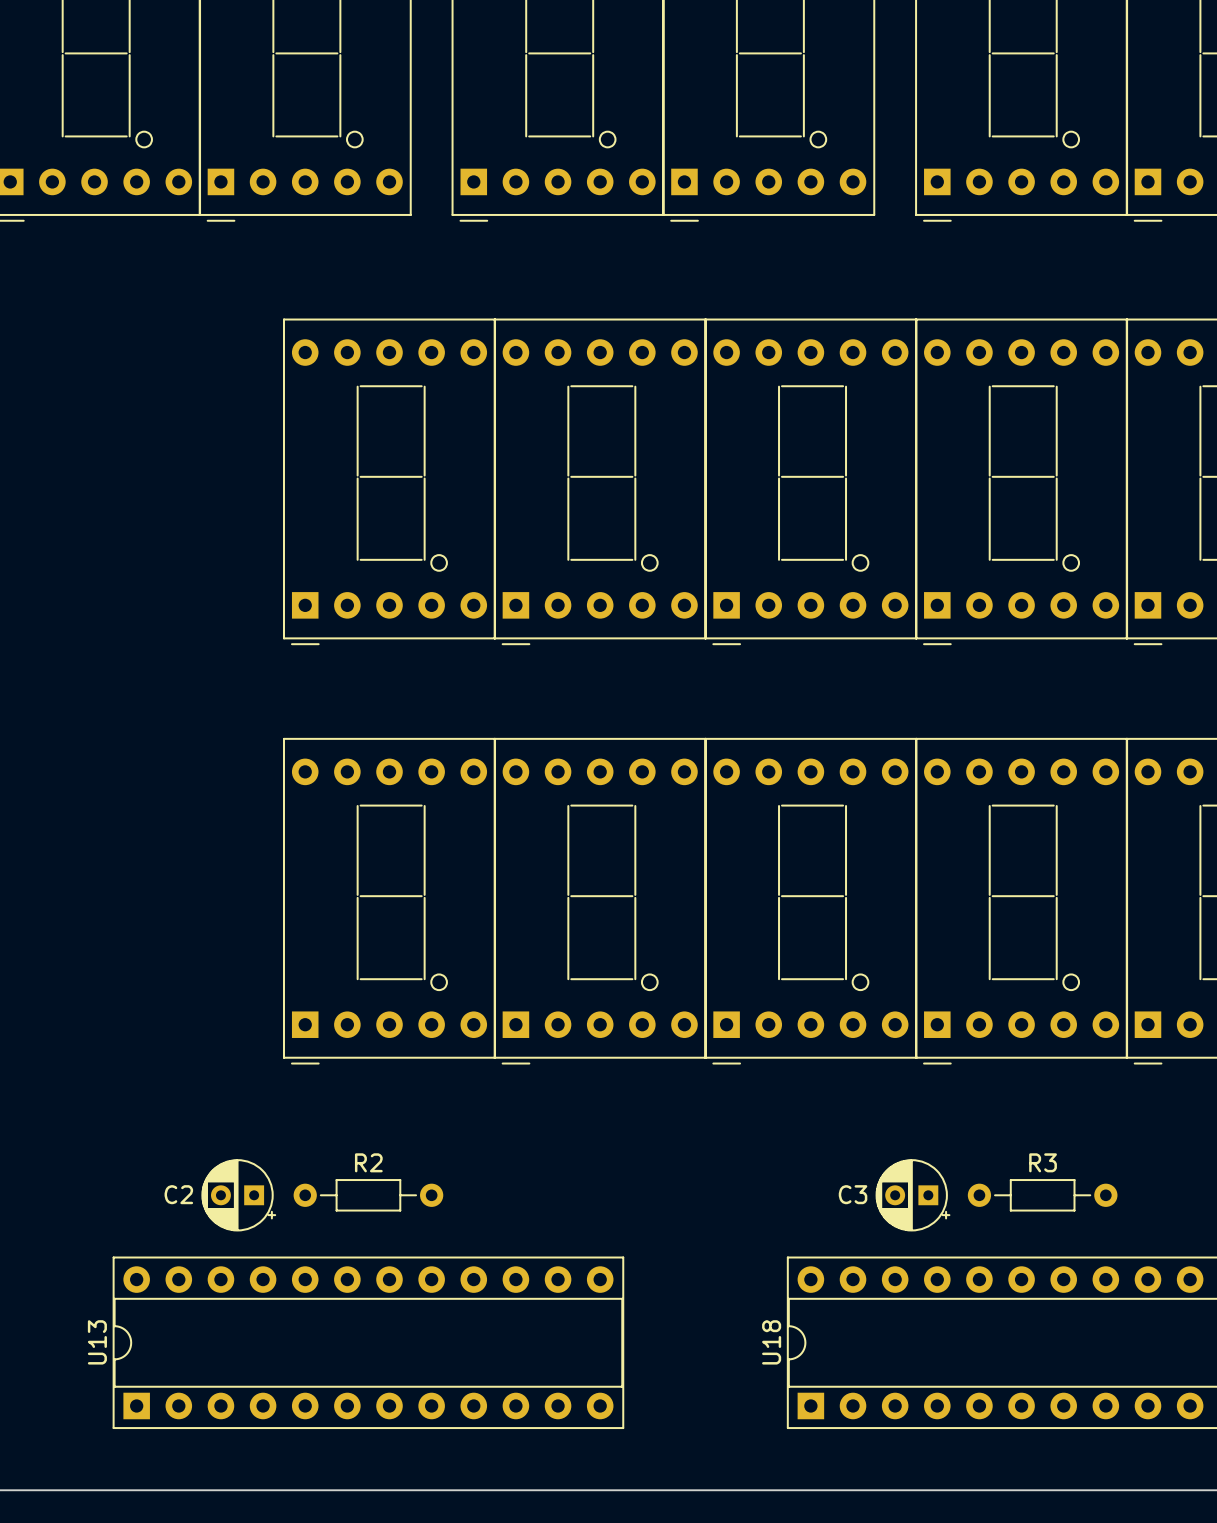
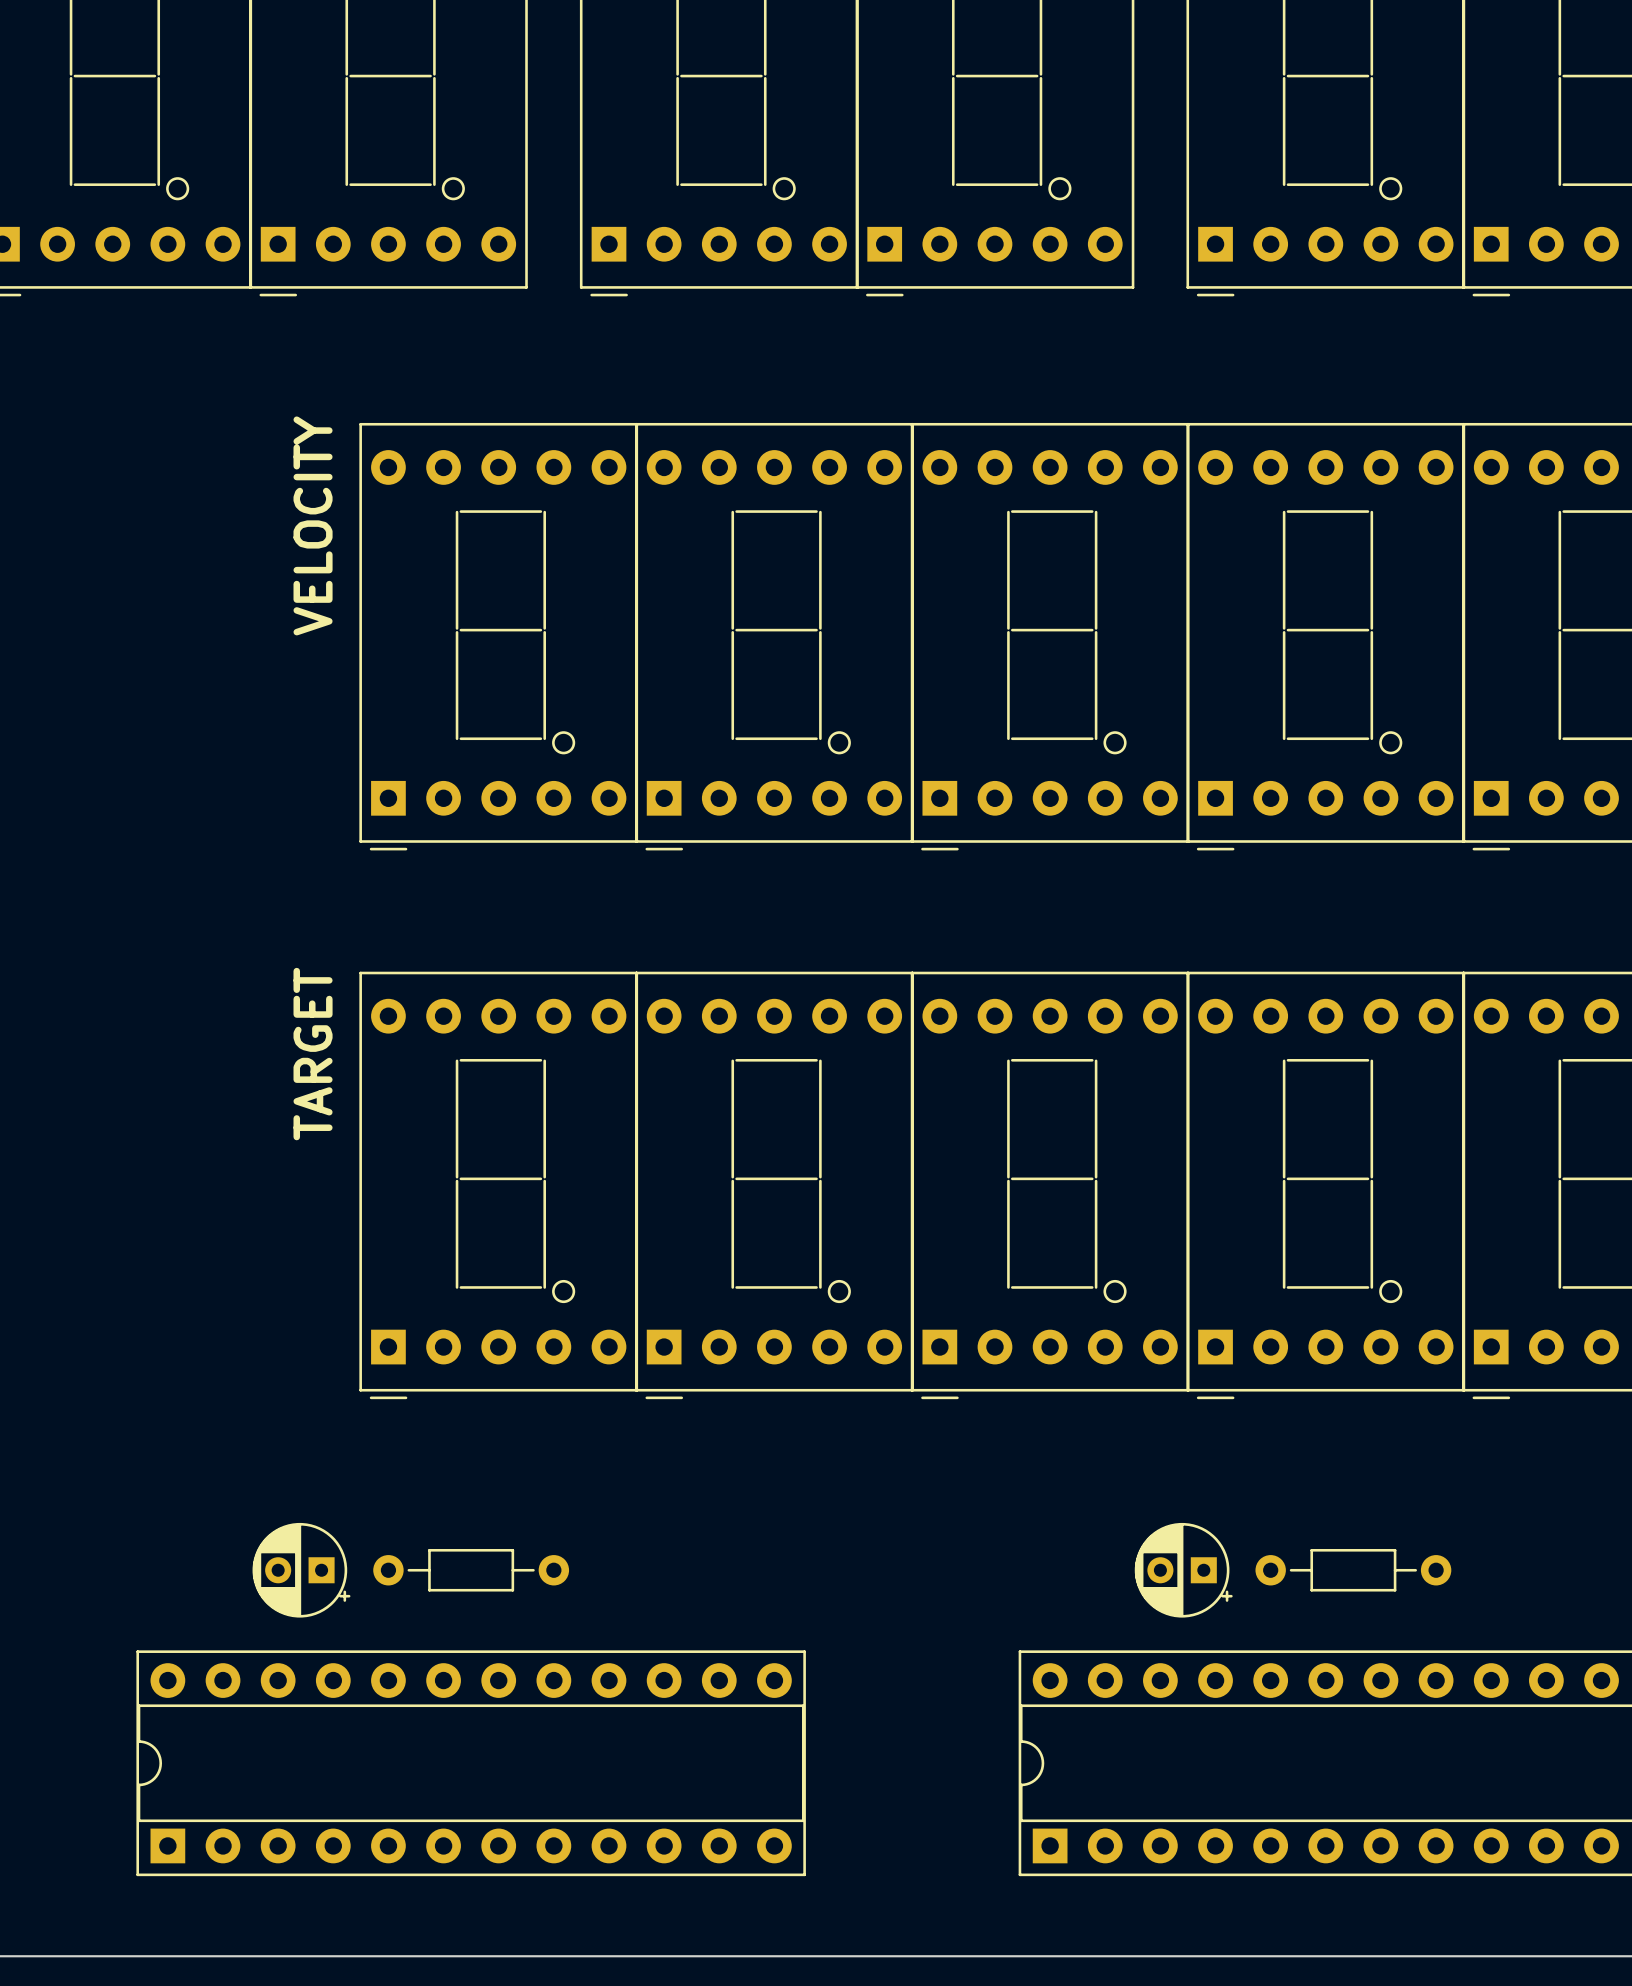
text: none -> VELOCITY (313, 525)
text: none -> TARGET (313, 1054)
R2 name: R2 (368, 1162) -> none
R3 name: R3 (1043, 1162) -> none
C2 name: C2 (178, 1194) -> none
C3 name: C3 (853, 1194) -> none
U13 name: U13 (97, 1342) -> none
U18 name: U18 (771, 1342) -> none

